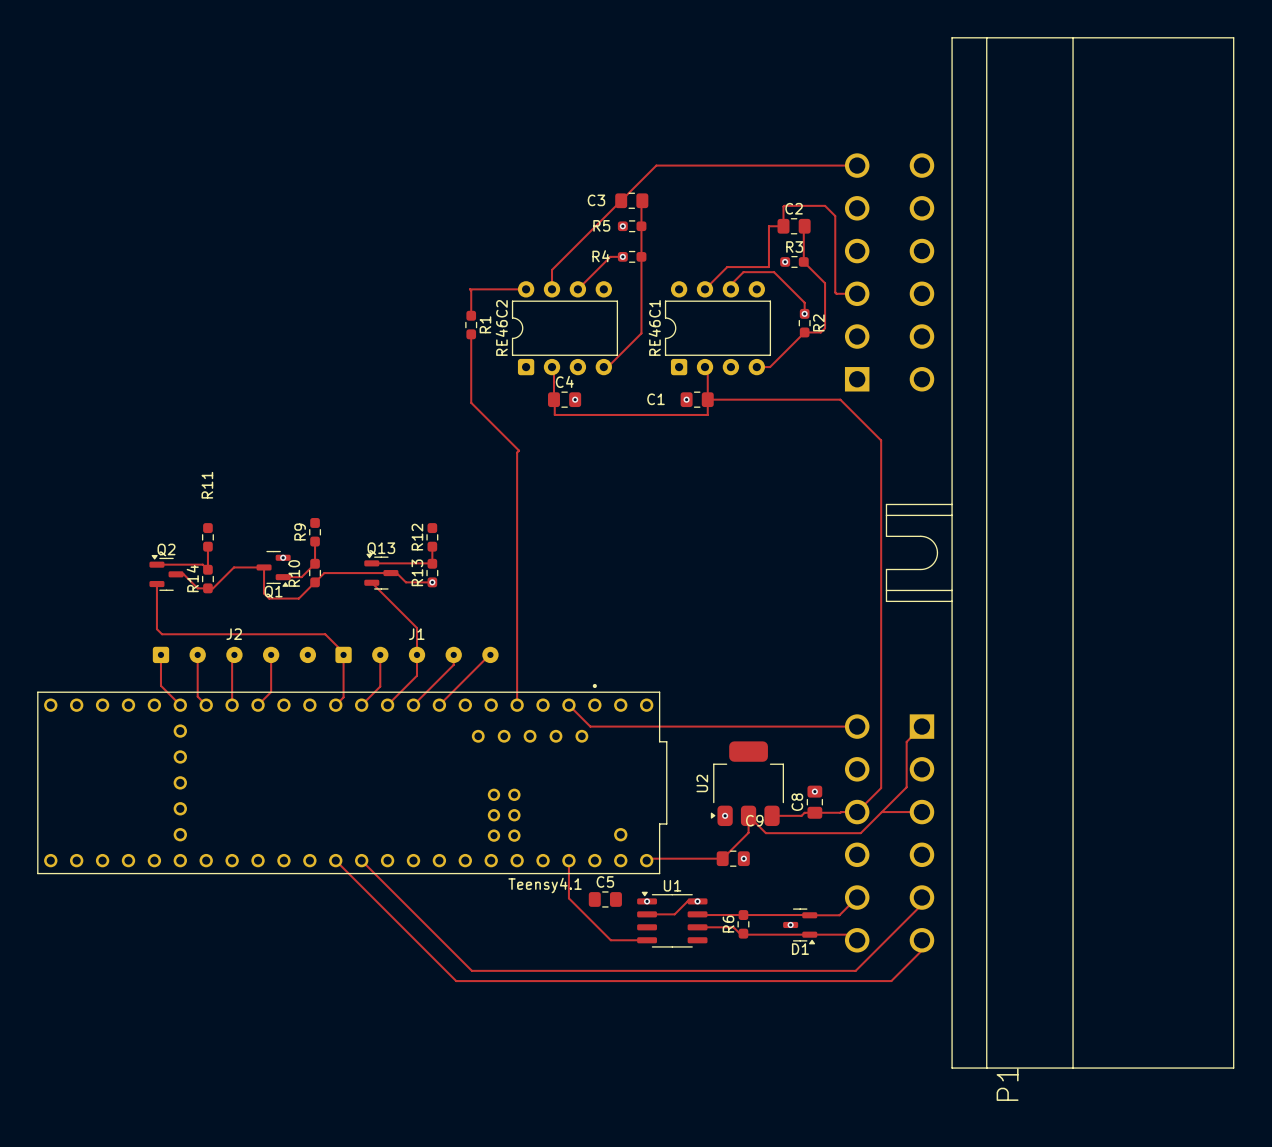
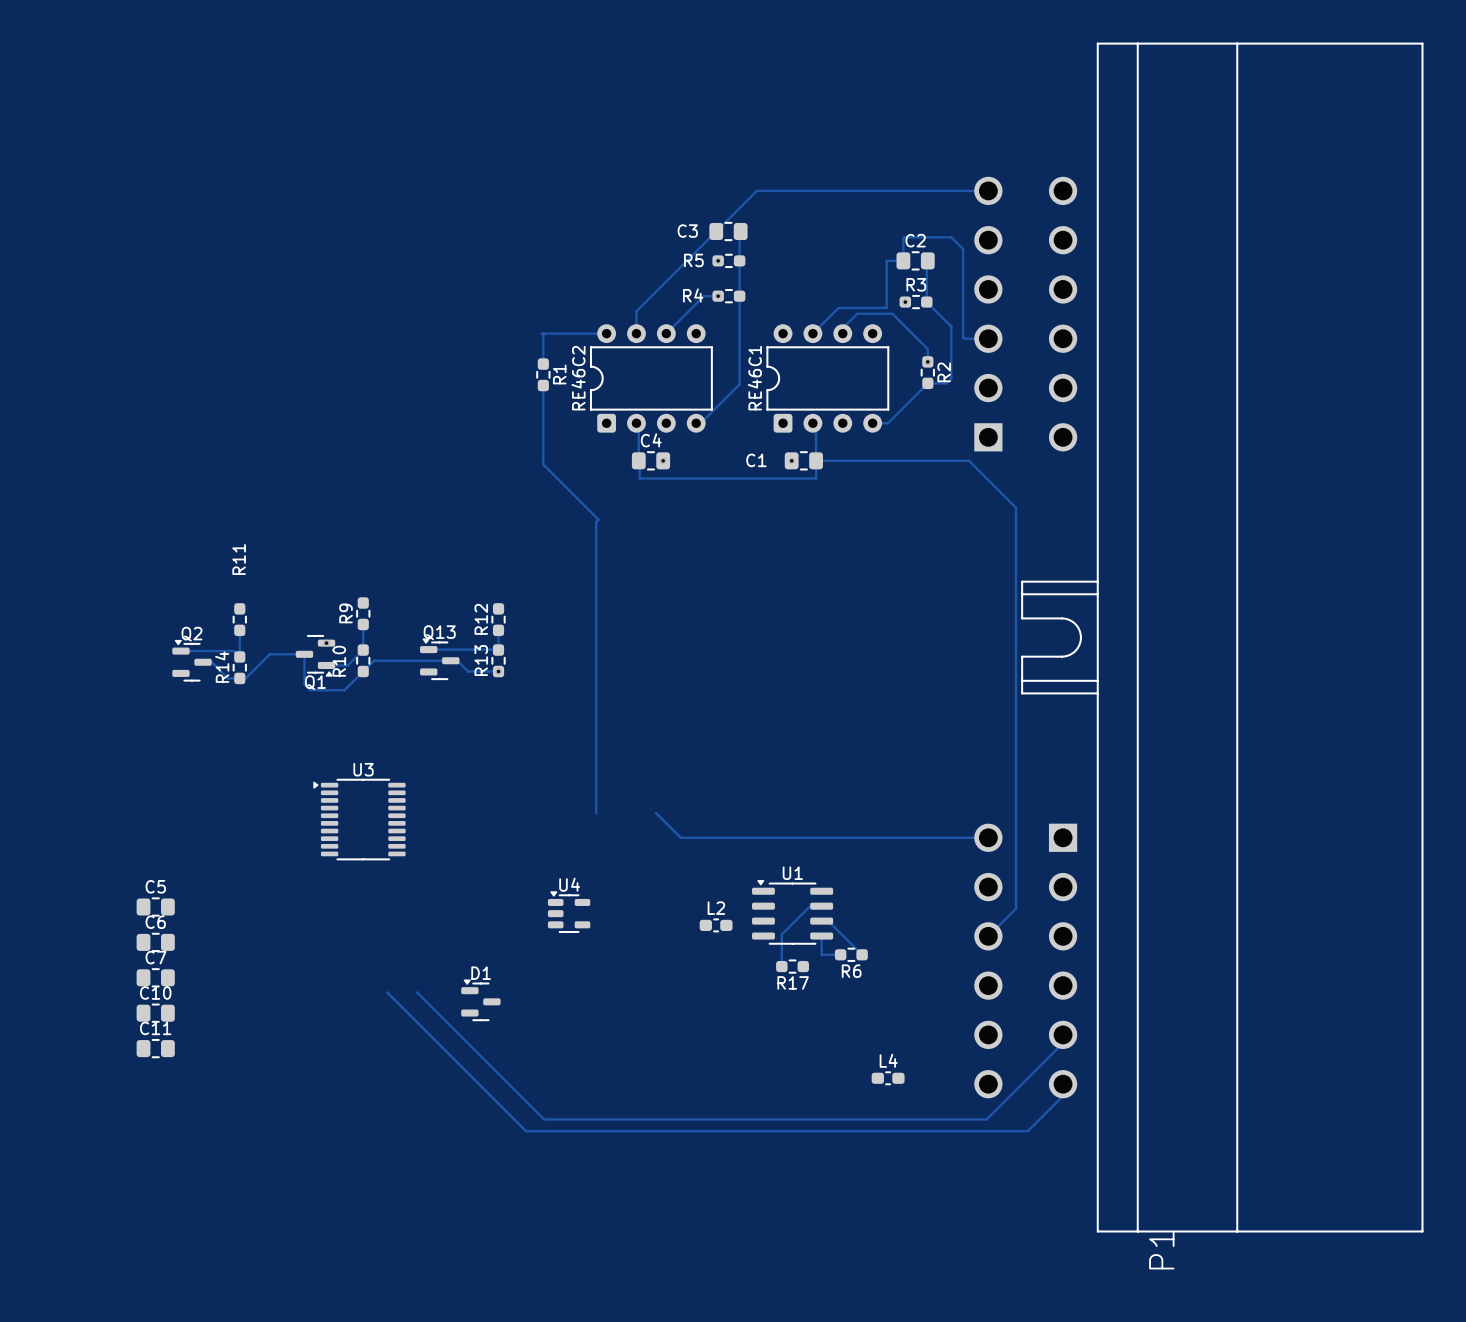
track: (371, 582) (417, 627) (417, 675) (387, 705) -> none
track: (156, 584) (156, 629) (162, 634) (325, 634) (343, 652) -> none
track: (343, 652) (343, 697) (335, 705) -> none
track: (160, 654) (160, 685) (180, 705) -> none
track: (197, 654) (197, 696) (206, 705) -> none
track: (234, 654) (232, 657) (232, 705) -> none
J2: (234, 654) -> none
track: (271, 654) (271, 692) (258, 705) -> none
track: (380, 654) (380, 686) (361, 705) -> none
J1: (417, 654) -> none
track: (453, 654) (453, 664) (413, 705) -> none
track: (490, 654) (439, 705) -> none
U3: none -> (359, 819)
track: (921, 726) (906, 741) (906, 787) (860, 833) (765, 833) (748, 815) (748, 832) (722, 858) (648, 858) (646, 860) -> none
Teensy4.1: (352, 779) -> none
U2: (747, 783) -> none
track: none -> (821, 906) (810, 906) (781, 934) (781, 966)
U4: none -> (569, 911)
via: (814, 791) -> none
track: none -> (821, 921) (828, 921) (862, 954)
L2: none -> (716, 925)
C8: (814, 802) -> none
track: none -> (821, 936) (821, 954) (840, 954)
track: (857, 812) (804, 812) (801, 815) (772, 815) -> none
track: (881, 812) (921, 812) -> none
via: (725, 815) -> none
C6: none -> (155, 942)
R17: none -> (792, 966)
C7: none -> (155, 977)
C9: (733, 858) -> none
via: (743, 858) -> none
track: (568, 860) (568, 898) (610, 940) (647, 940) -> none
C10: none -> (155, 1013)
track: (857, 897) (839, 915) (697, 914) -> none
C5 position: (605, 899) -> (155, 906)
via: (647, 901) -> none
track: (697, 901) (687, 901) (674, 914) (647, 914) -> none
via: (697, 901) -> none
C11: none -> (155, 1048)
U1 position: (672, 919) -> (792, 912)
R6 name position: R6 (728, 924) -> R6 (851, 971)
R6 rotation: 0° (743, 924) -> 90° clockwise (851, 954)
R6 position: (743, 924) -> (851, 954)
via: (790, 924) -> none
D1 rotation: 0° (800, 926) -> 180° (480, 1000)
D1 position: (800, 926) -> (480, 1000)
track: (697, 927) (733, 927) (739, 933) (744, 934) (851, 934) -> none
L4: none -> (888, 1078)

